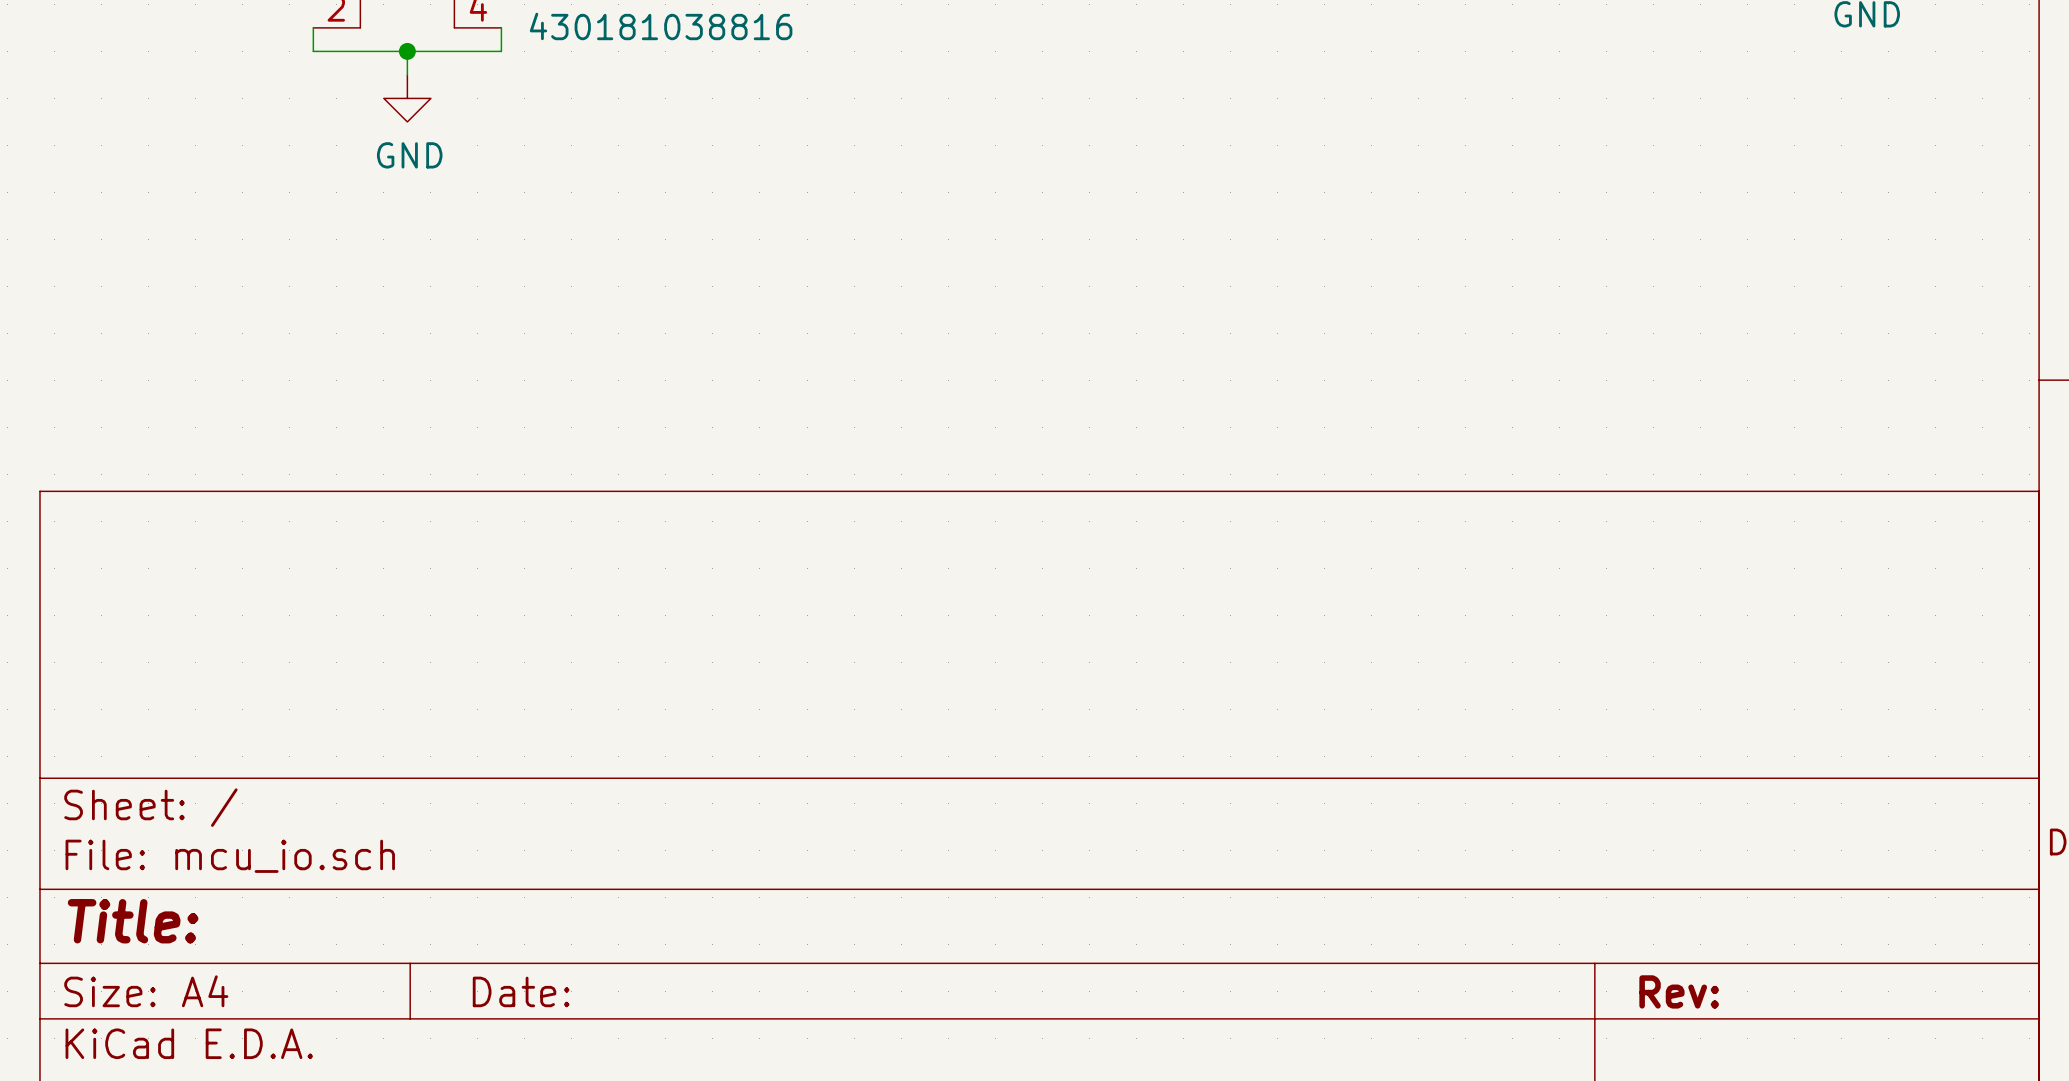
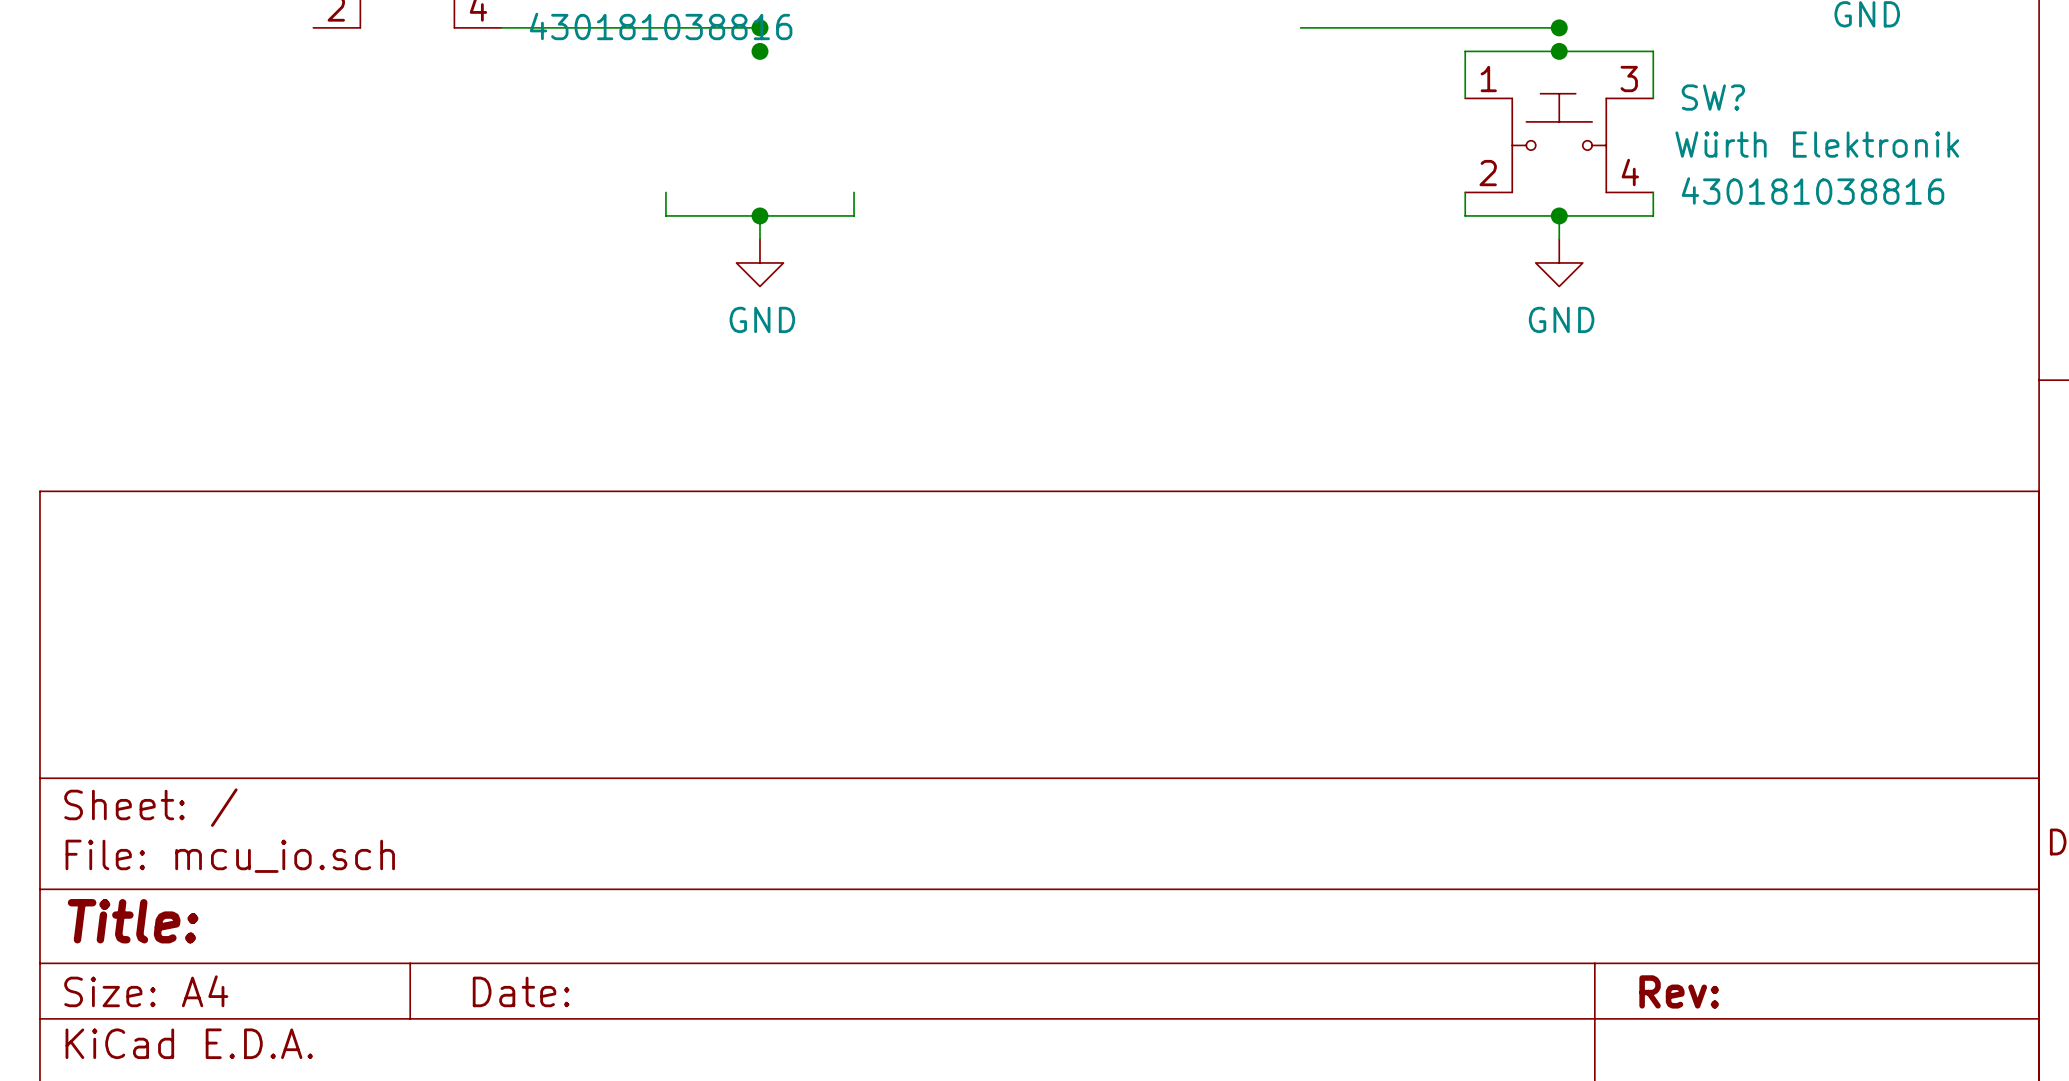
wire: (313, 27) (313, 51) (501, 51) (501, 27) -> (759, 27) (501, 27)
junction: none -> (759, 27)
wire: none -> (1300, 27) (1559, 27)
junction: none -> (1559, 27)
wire: (407, 51) (407, 74) -> (759, 215) (759, 239)
junction: (407, 51) -> none
junction: none -> (759, 51)
junction: none -> (1559, 51)
power symbol position: GND (407, 98) -> GND (759, 262)
wire: none -> (1465, 98) (1465, 51) (1653, 51) (1653, 98)
SW?: none -> (1559, 143)
wire: none -> (665, 192) (665, 215) (854, 215) (854, 192)
wire: none -> (1465, 192) (1465, 215) (1653, 215) (1653, 192)
junction: none -> (759, 215)
wire: none -> (1559, 215) (1559, 239)
junction: none -> (1559, 215)
power symbol: none -> GND (1559, 262)

